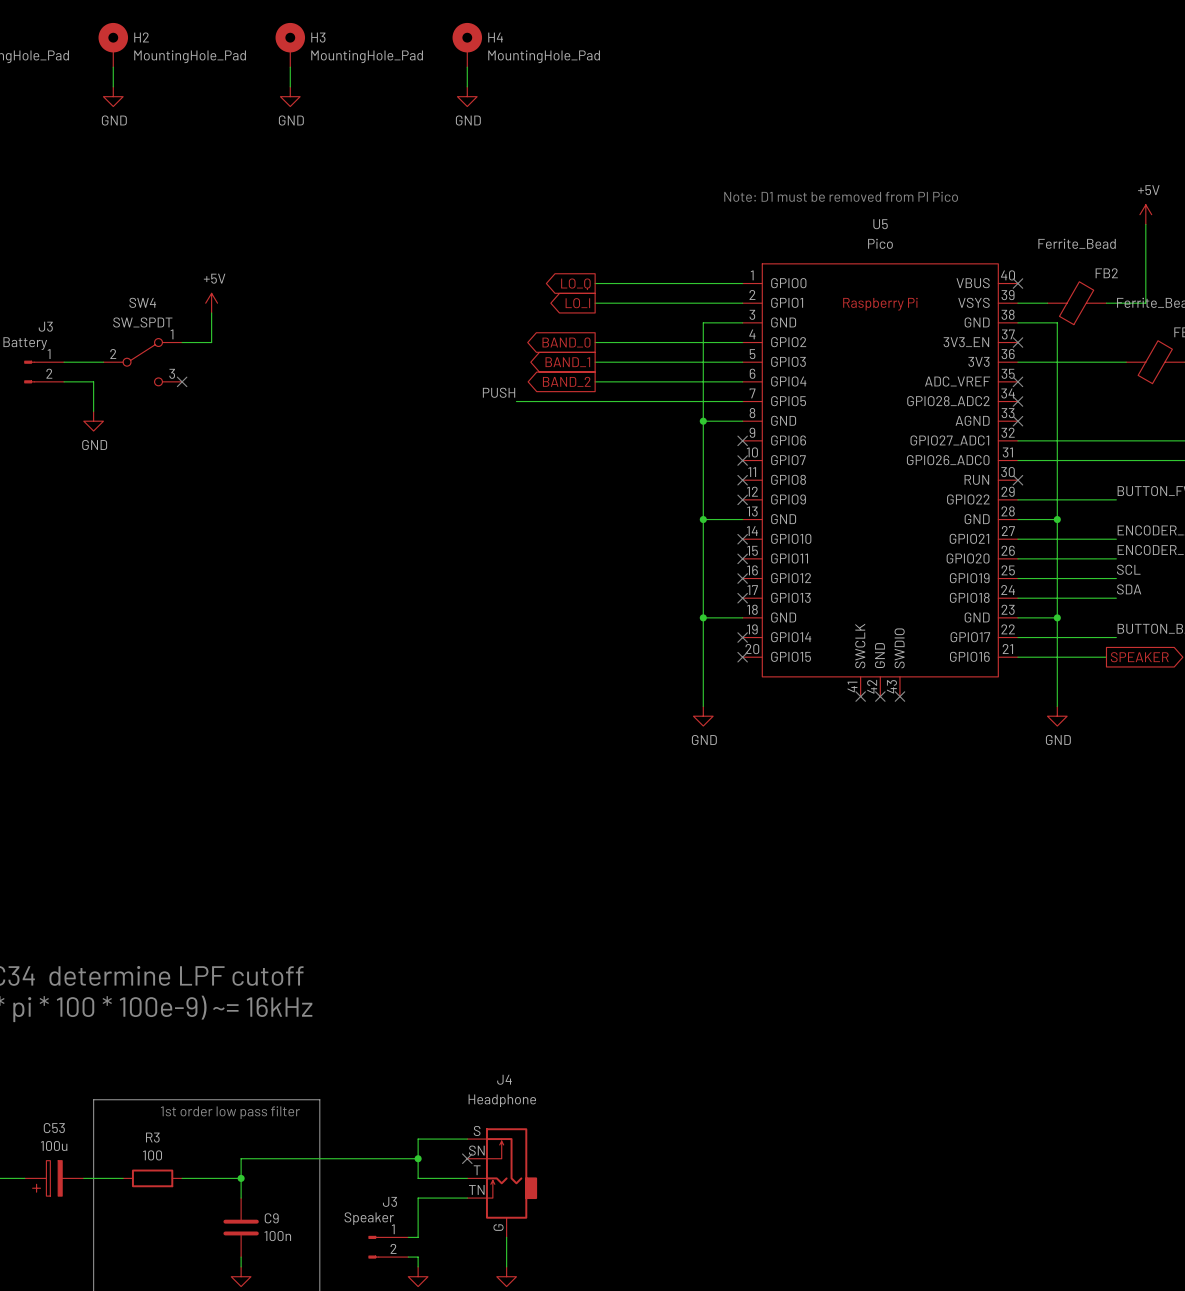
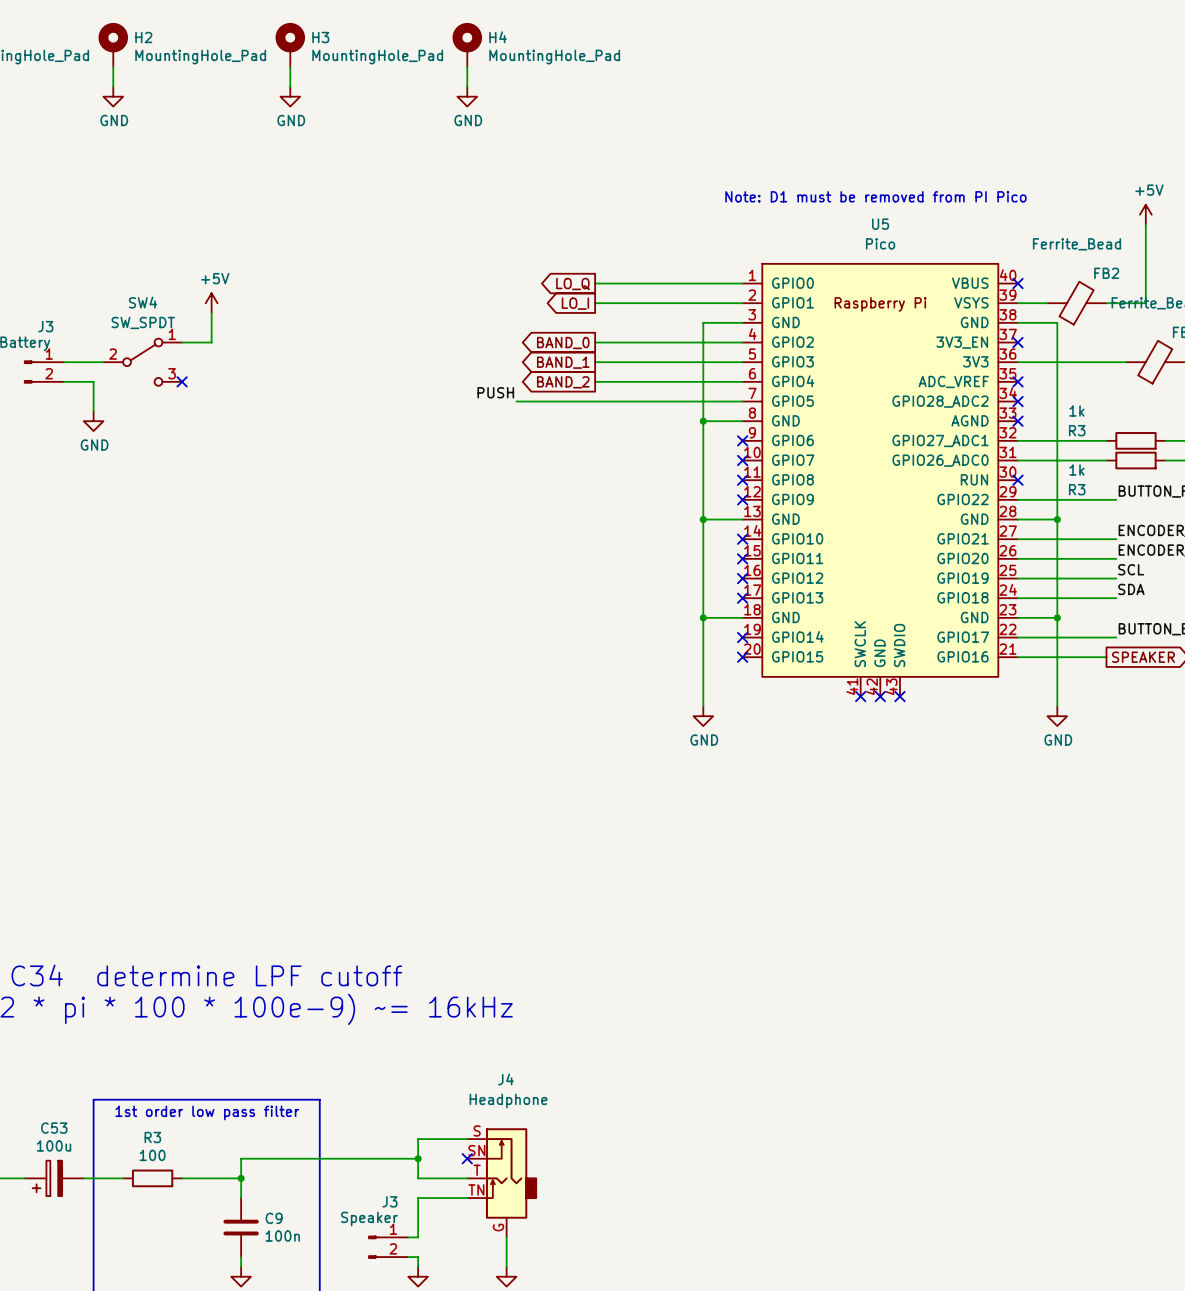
wire: (1106, 440) (1165, 440) -> none
R3: none -> 1k (1135, 440)
wire: (1106, 460) (1165, 460) -> none
R3: none -> 1k (1135, 460)

